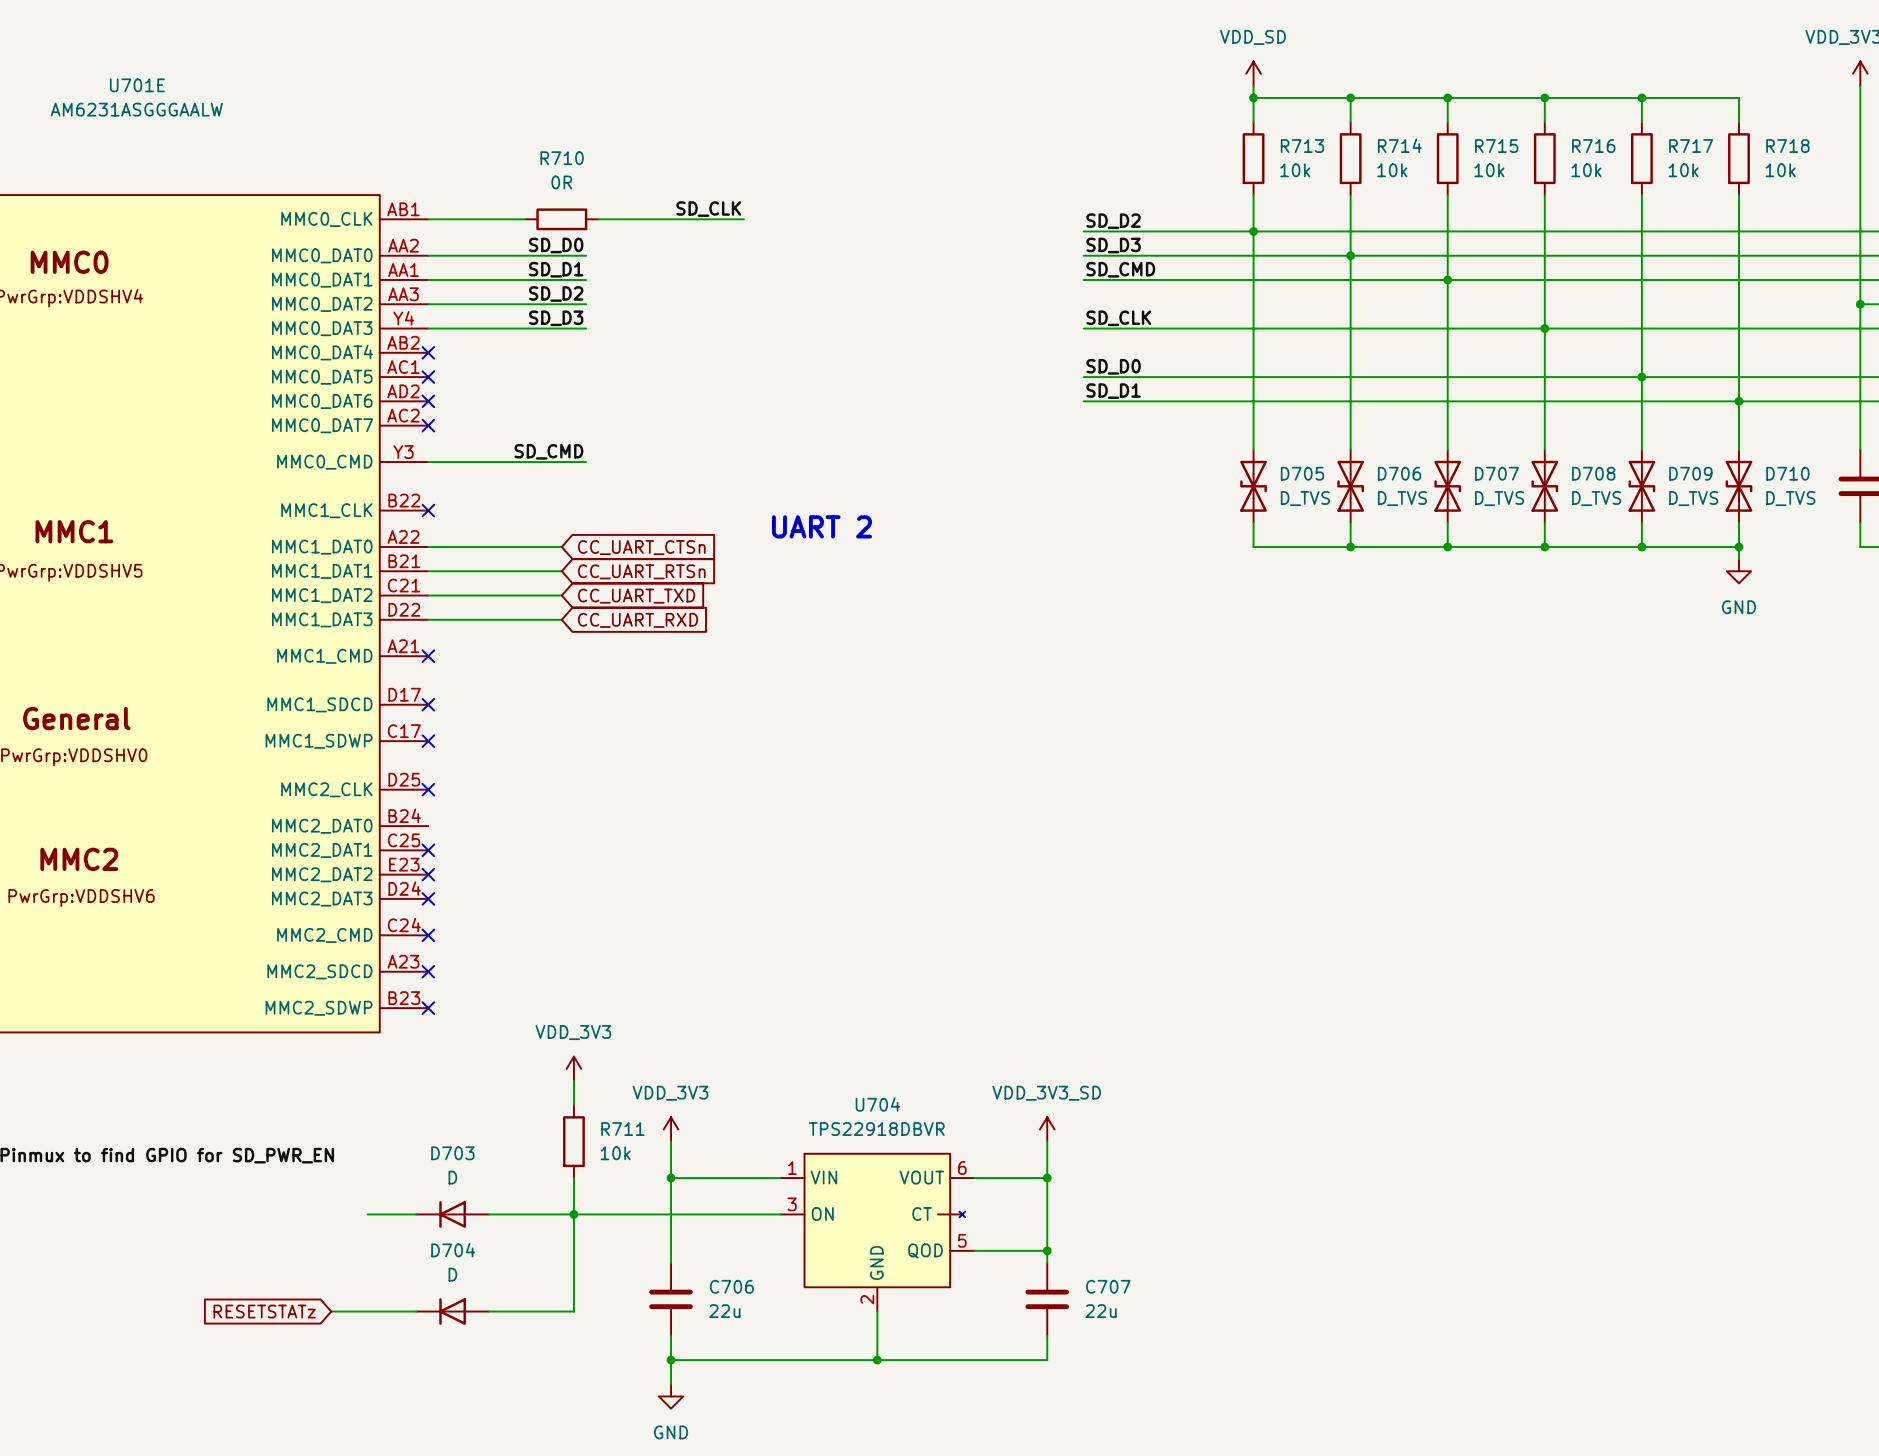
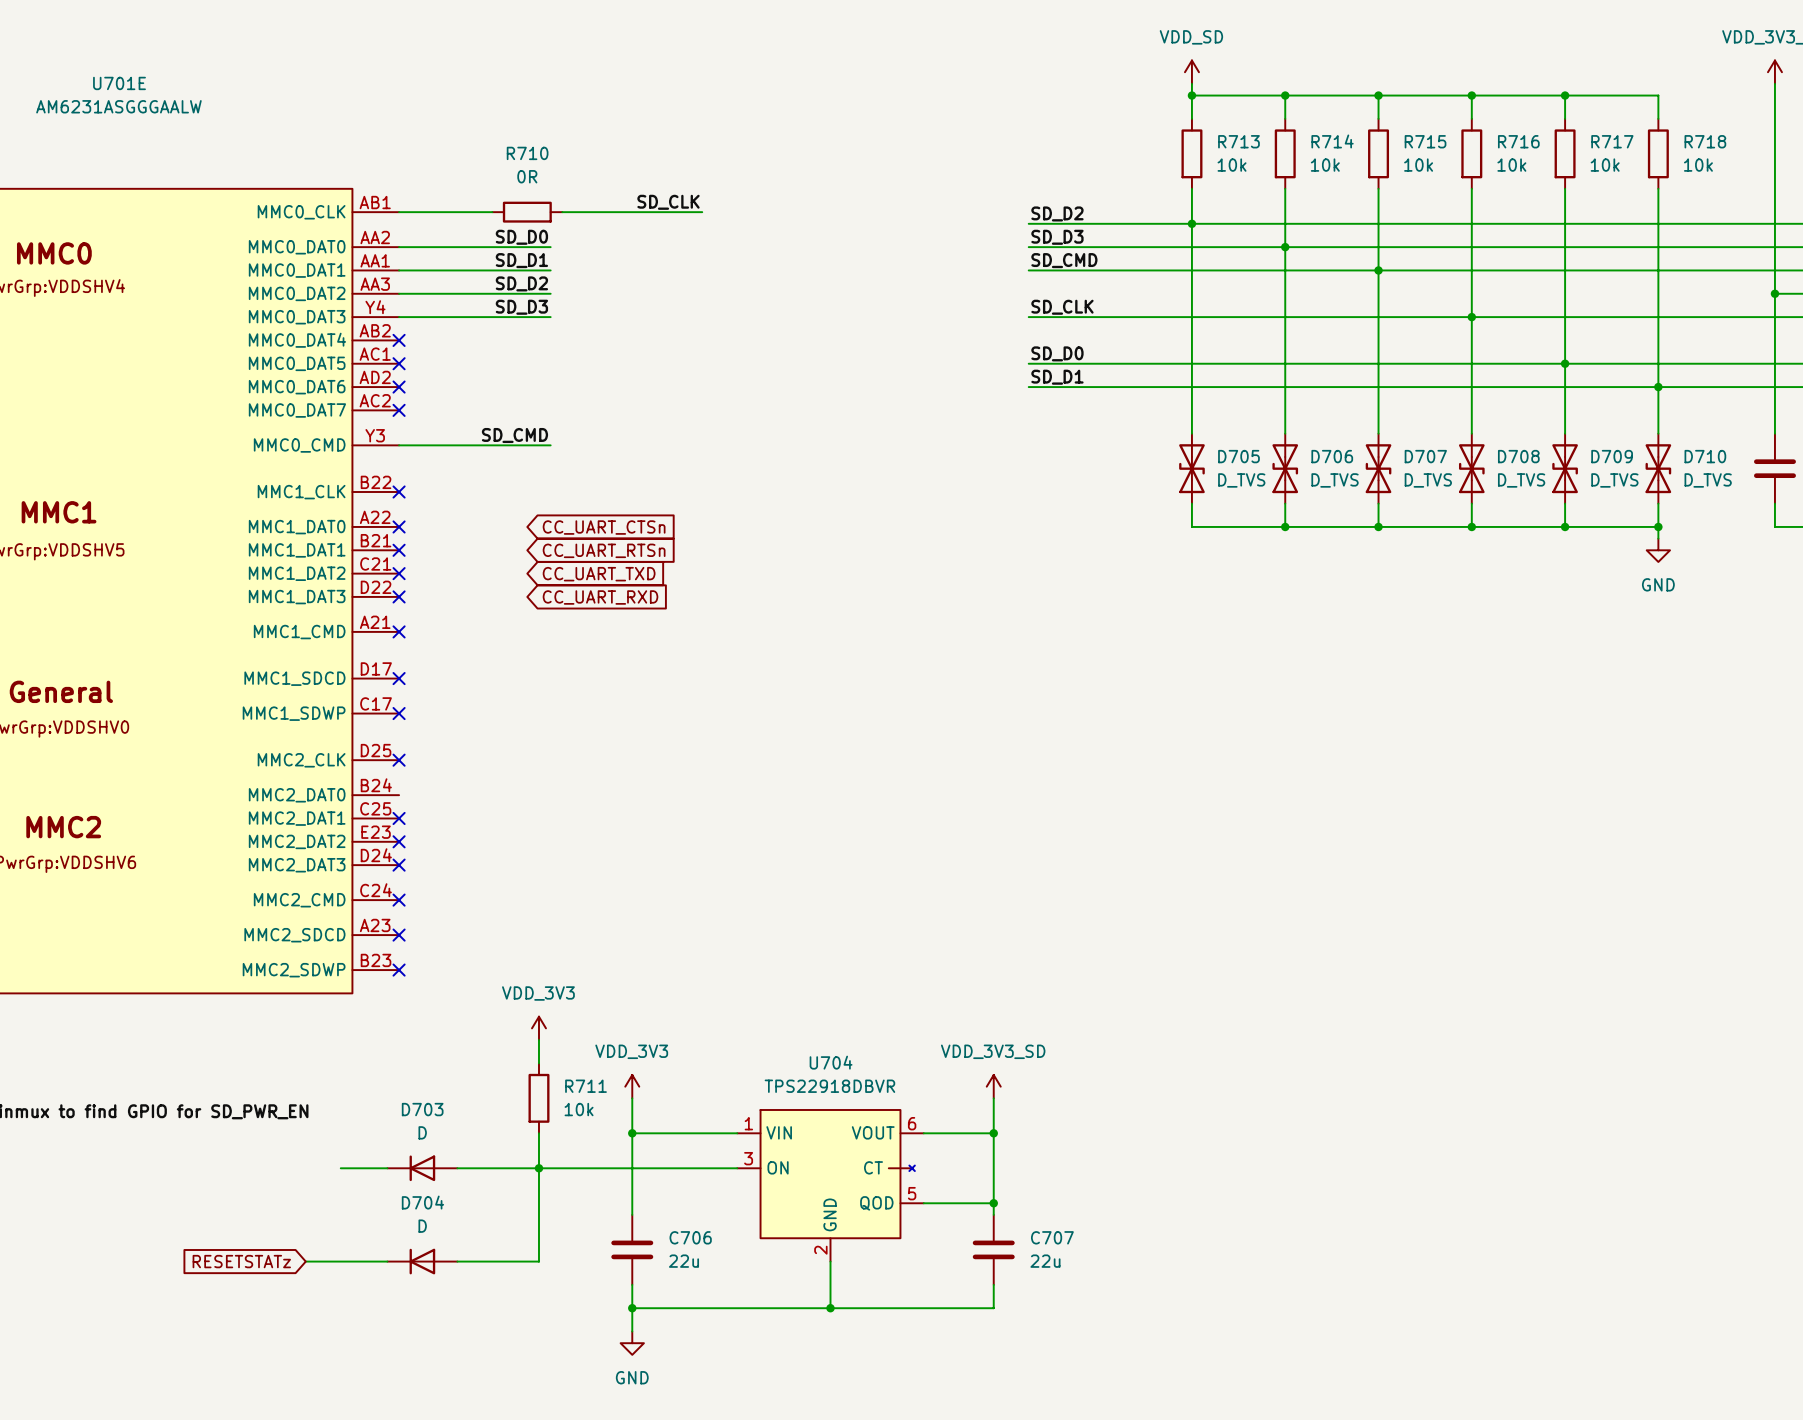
text: UART 2 (821, 526) -> none
wire: (428, 546) (561, 546) -> none
no-connect mark: none -> (399, 526)
wire: (428, 571) (561, 571) -> none
no-connect mark: none -> (399, 550)
wire: (428, 595) (561, 595) -> none
no-connect mark: none -> (399, 573)
wire: (428, 619) (561, 619) -> none
no-connect mark: none -> (399, 596)

